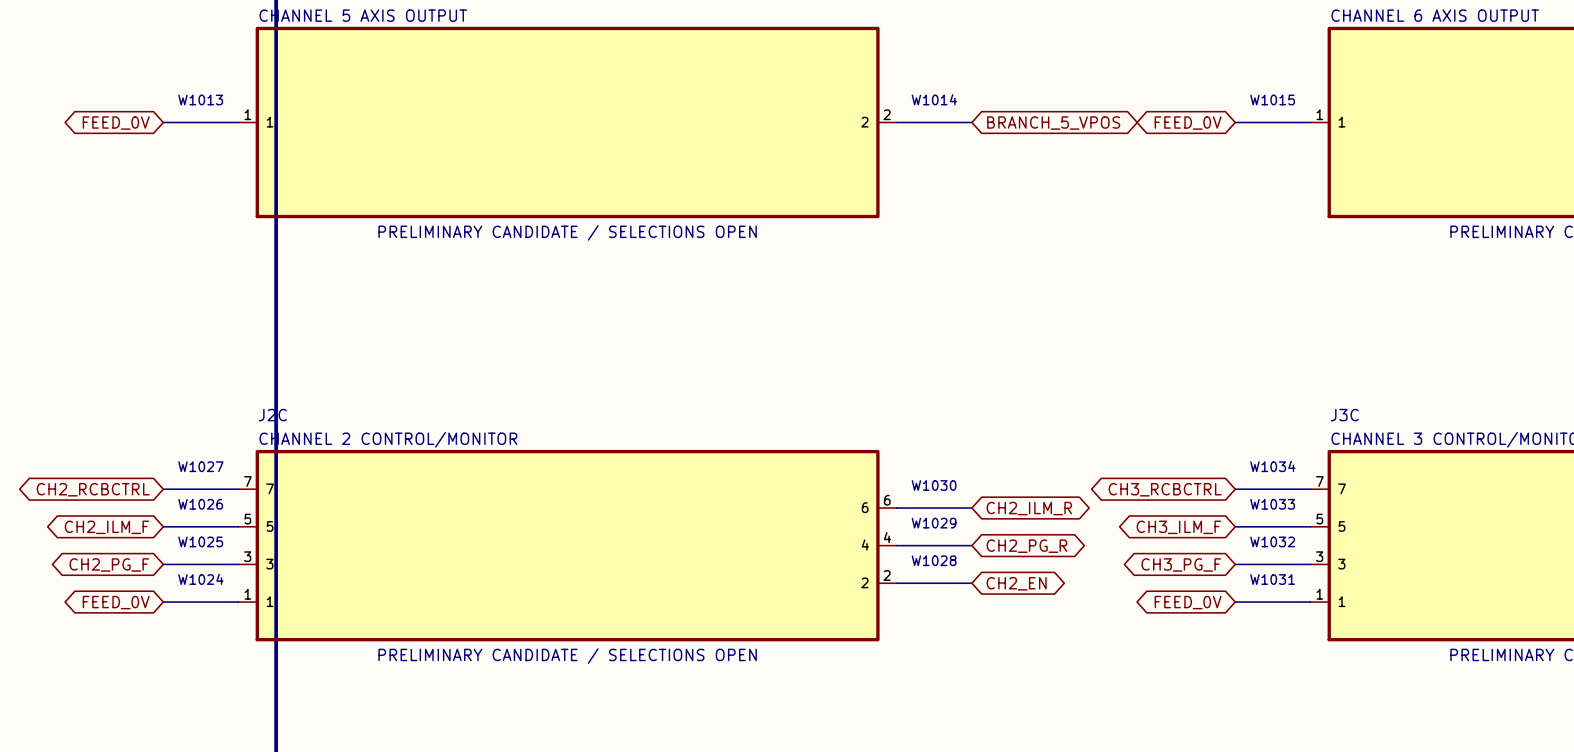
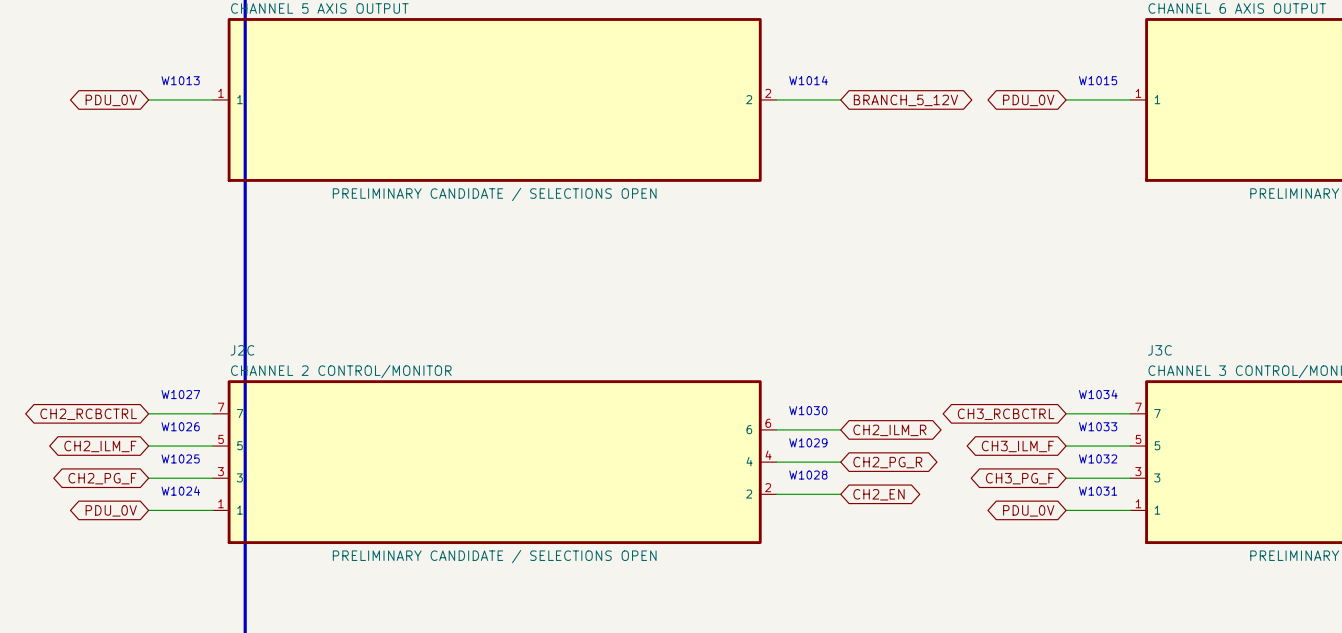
global label: FEED_0V (116, 123) -> PDU_0V (111, 100)
global label: BRANCH_5_VPOS (1053, 123) -> BRANCH_5_12V (905, 100)
global label: FEED_0V (1188, 123) -> PDU_0V (1028, 100)
global label: FEED_0V (116, 602) -> PDU_0V (111, 510)
global label: FEED_0V (1188, 602) -> PDU_0V (1028, 510)

